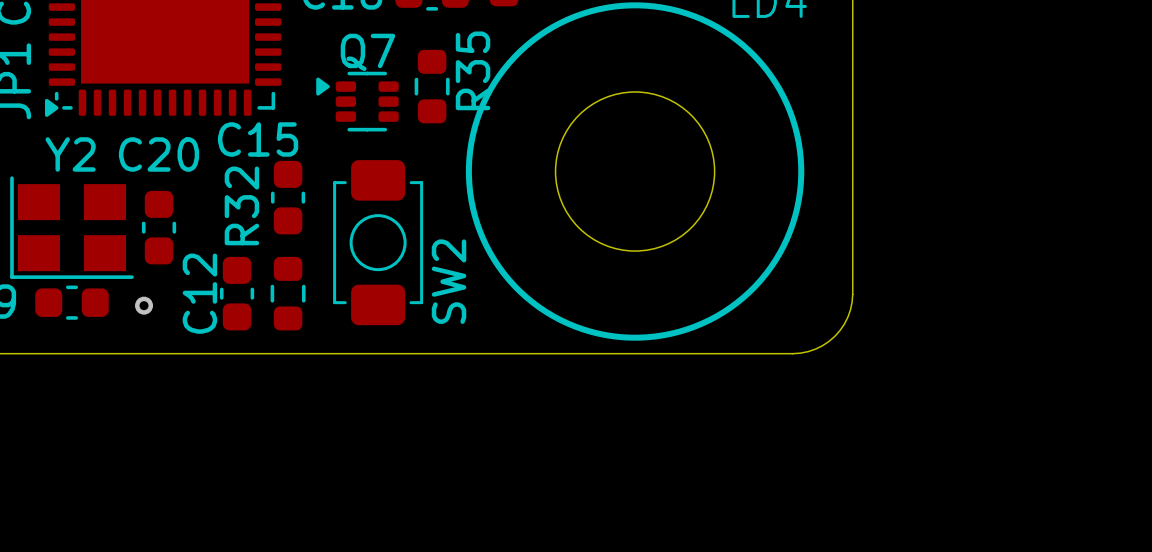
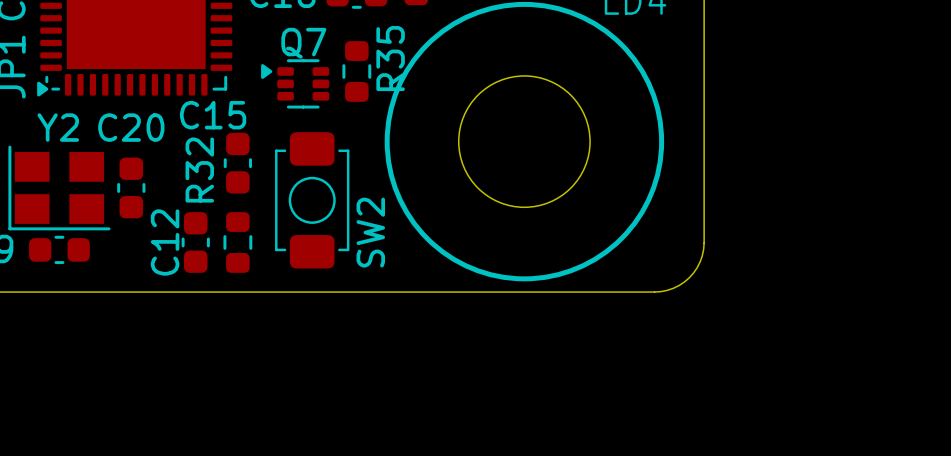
via: (144, 305) -> none

